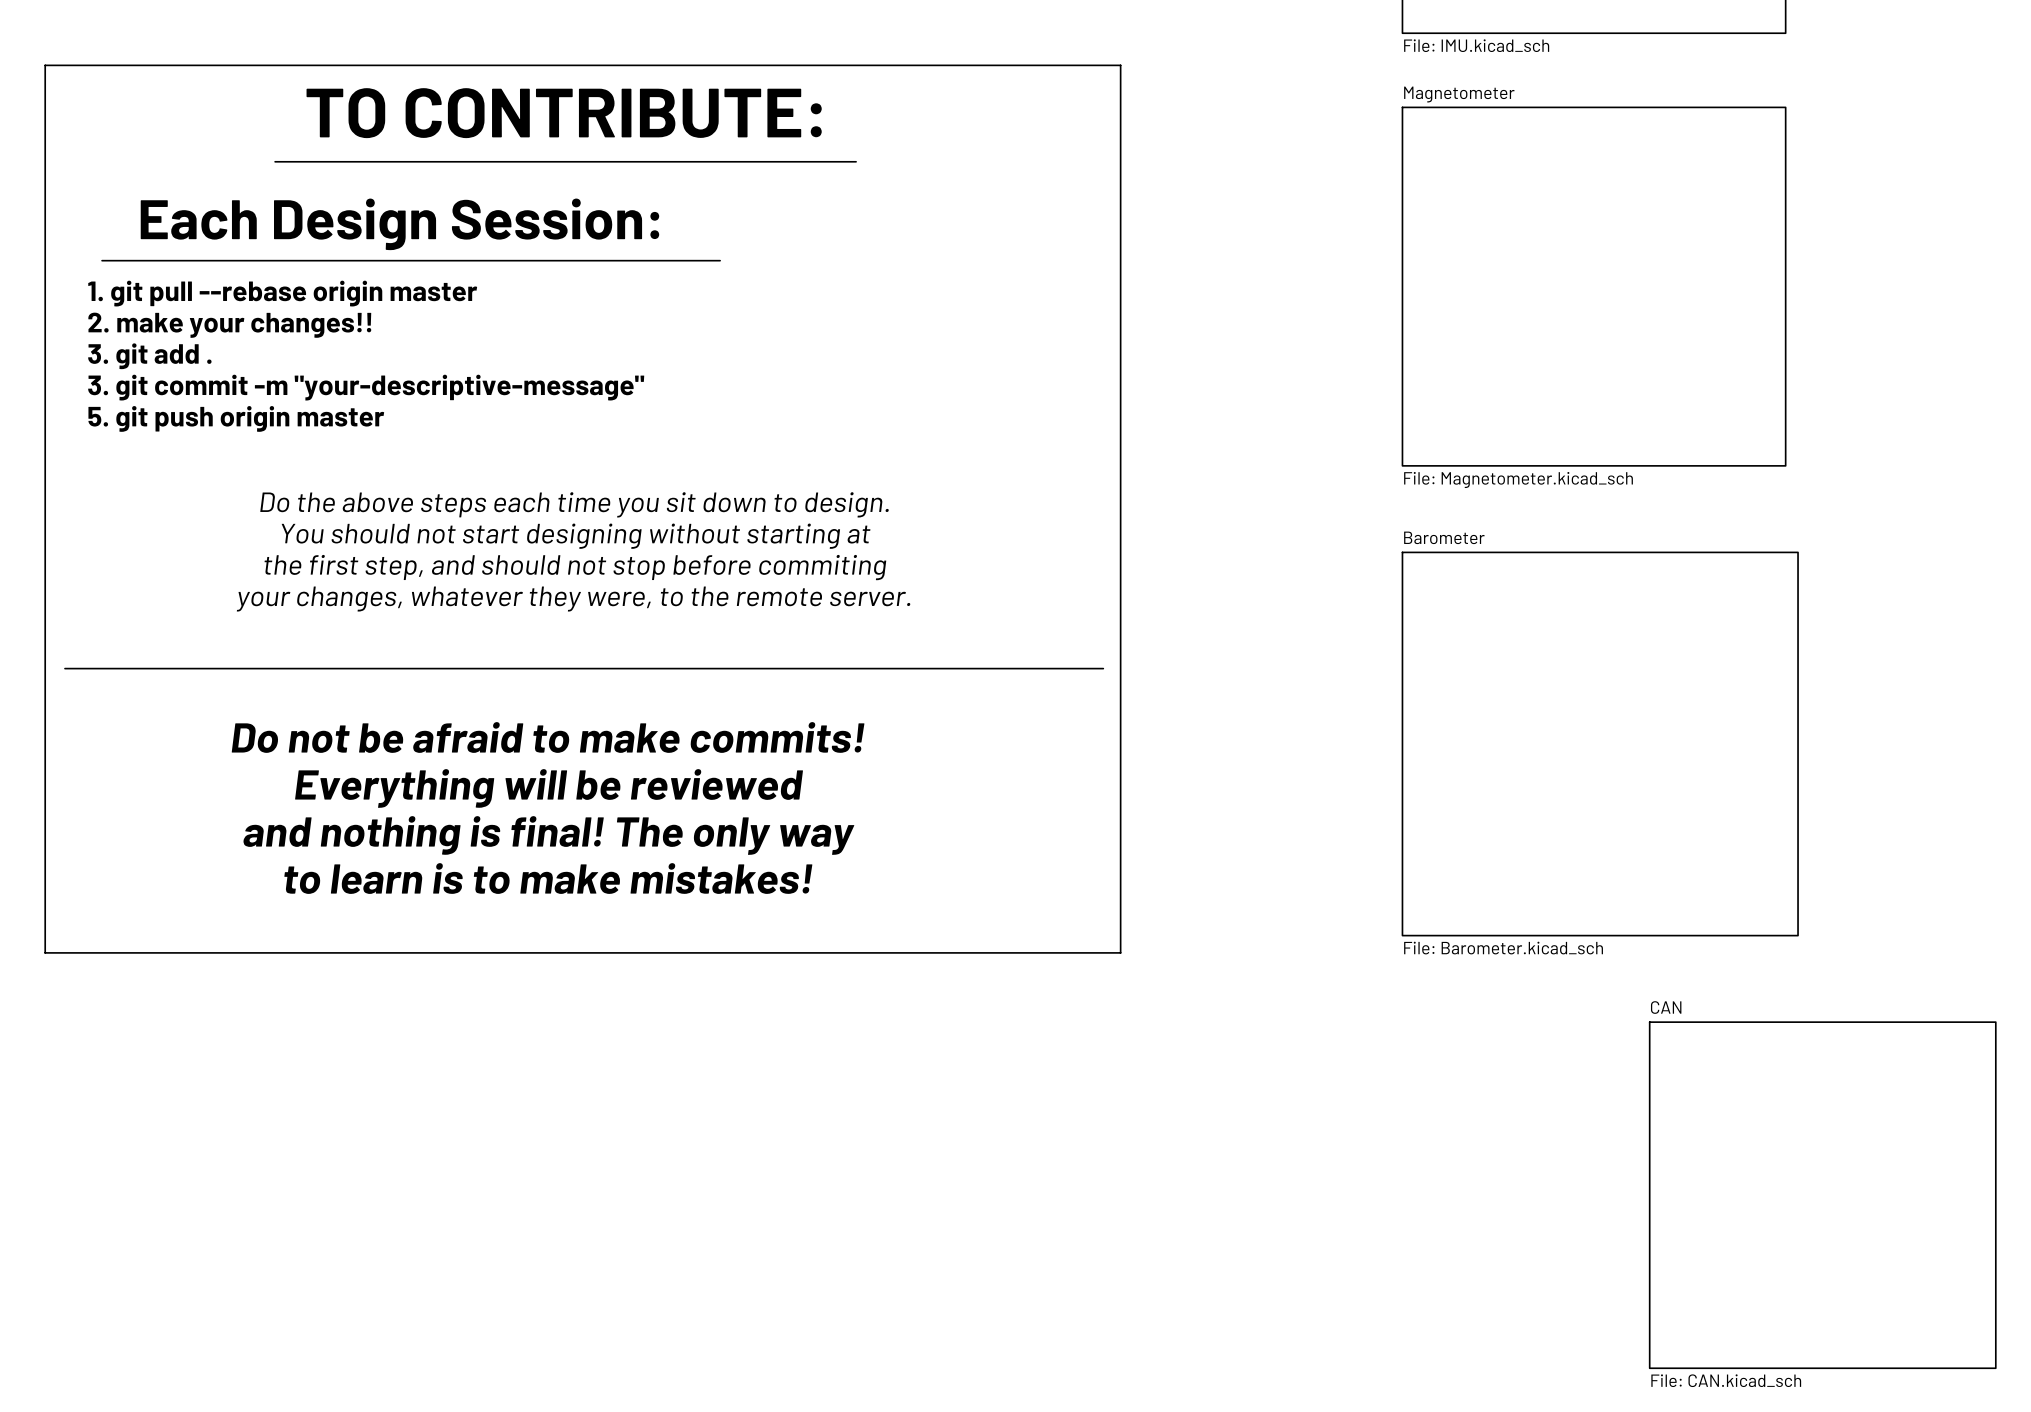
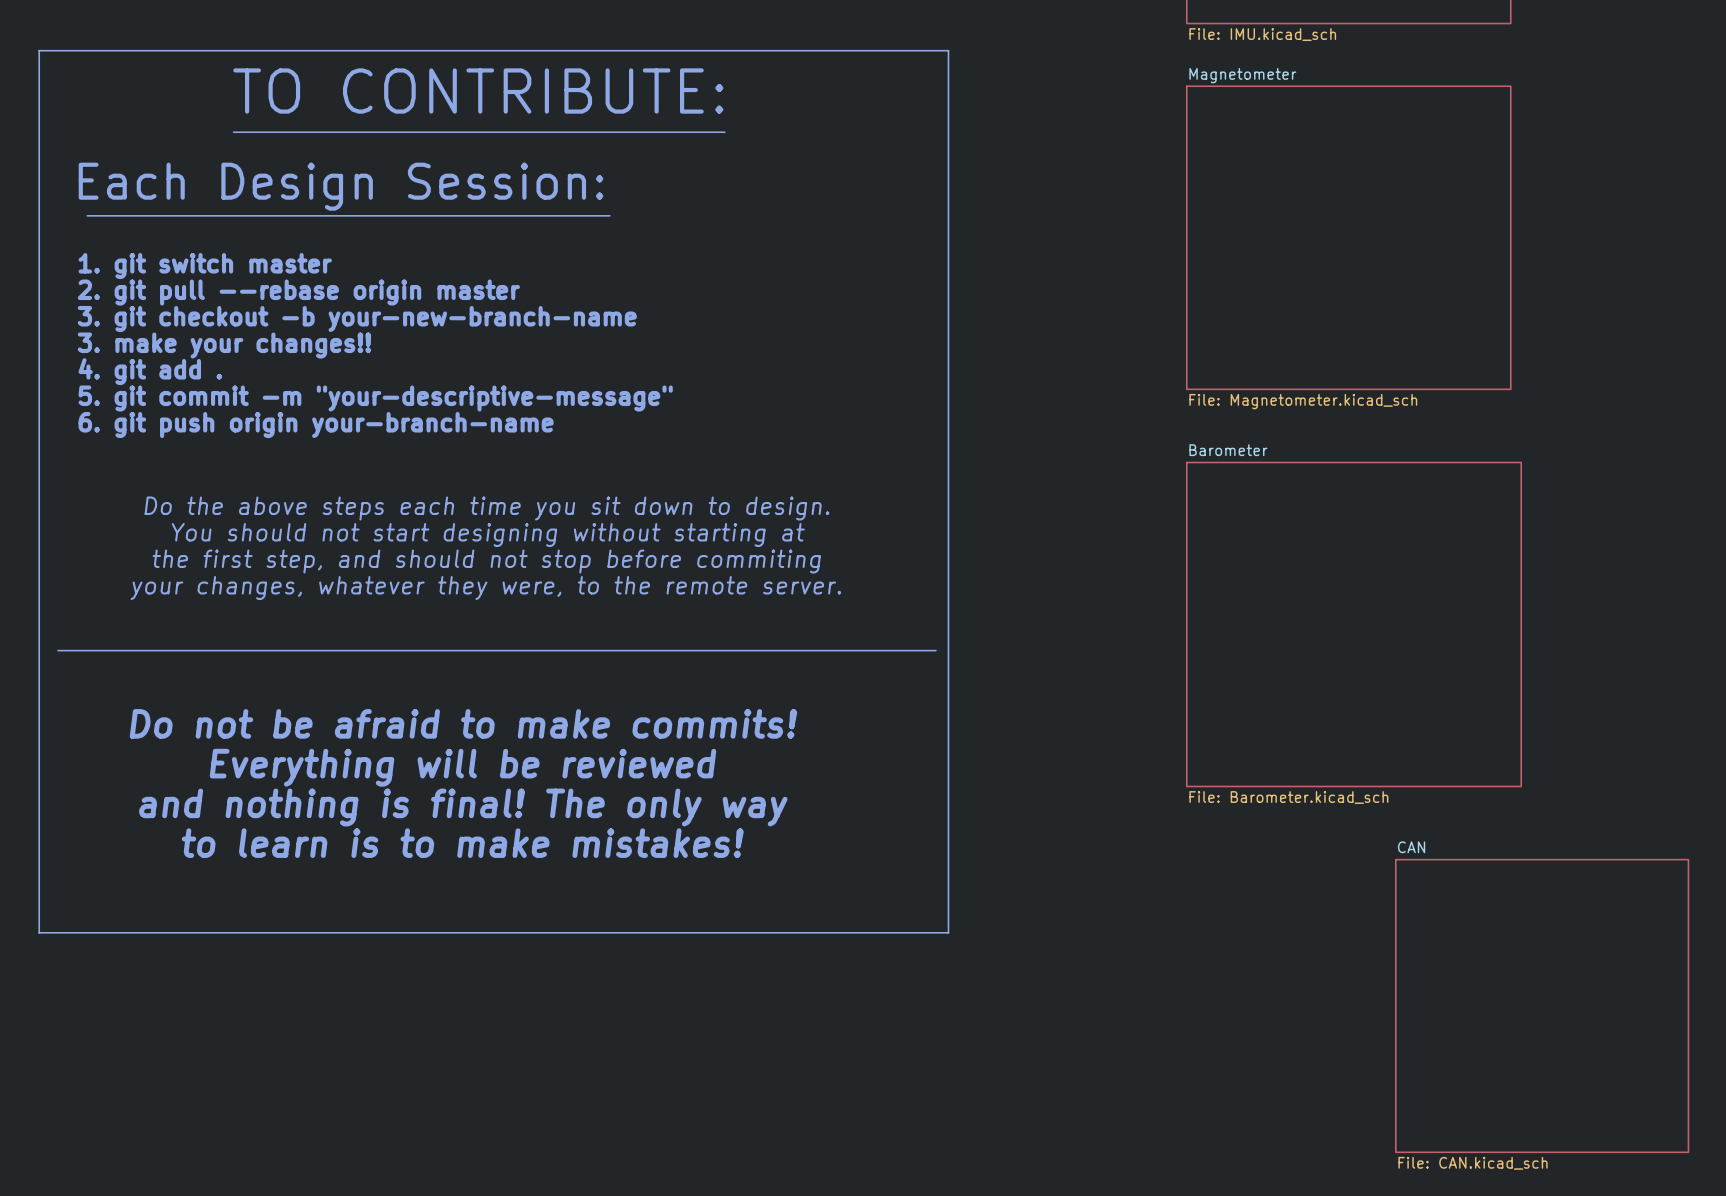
text: 1. git pull --rebase origin master (282, 293) -> none
text: 2. make your changes!! (229, 325) -> 1. git switch master (205, 266)
text: 3. git add . (149, 356) -> 2. git pull --rebase origin master (298, 292)
text: 3. git commit -m "your-descriptive-message" (366, 387) -> 3. git checkout -b your-new-branch-name (357, 319)
text: 5. git push origin master (236, 418) -> 3. make your changes!! (224, 345)
text: none -> 4. git add . (150, 371)
text: none -> 5. git commit -m "your-descriptive-message" (375, 398)
text position: Do the above steps each time you sit down to design. (574, 504) -> Do the above steps each time you sit down to design. (486, 508)
text: none -> 6. git push origin your-branch-name (316, 425)
text position: You should not start designing without starting at (576, 536) -> You should not start designing without starting at (488, 535)
text position: the first step, and should not stop before commiting (575, 567) -> the first step, and should not stop before commiting (486, 561)
text position: your changes, whatever they were, to the remote server. (573, 599) -> your changes, whatever they were, to the remote server. (485, 588)
line: (64, 668) (1103, 668) -> (58, 650) (935, 650)
text position: Do not be afraid to make commits! (548, 737) -> Do not be afraid to make commits! (463, 723)
text position: Everything will be reviewed (549, 788) -> Everything will be reviewed (462, 767)
text position: and nothing is final! The only way (548, 835) -> and nothing is final! The only way (463, 807)
text position: to learn is to make mistakes! (548, 878) -> to learn is to make mistakes! (462, 843)
line: (45, 952) (1120, 952) -> (39, 801) (39, 932) (948, 932) (948, 801)

